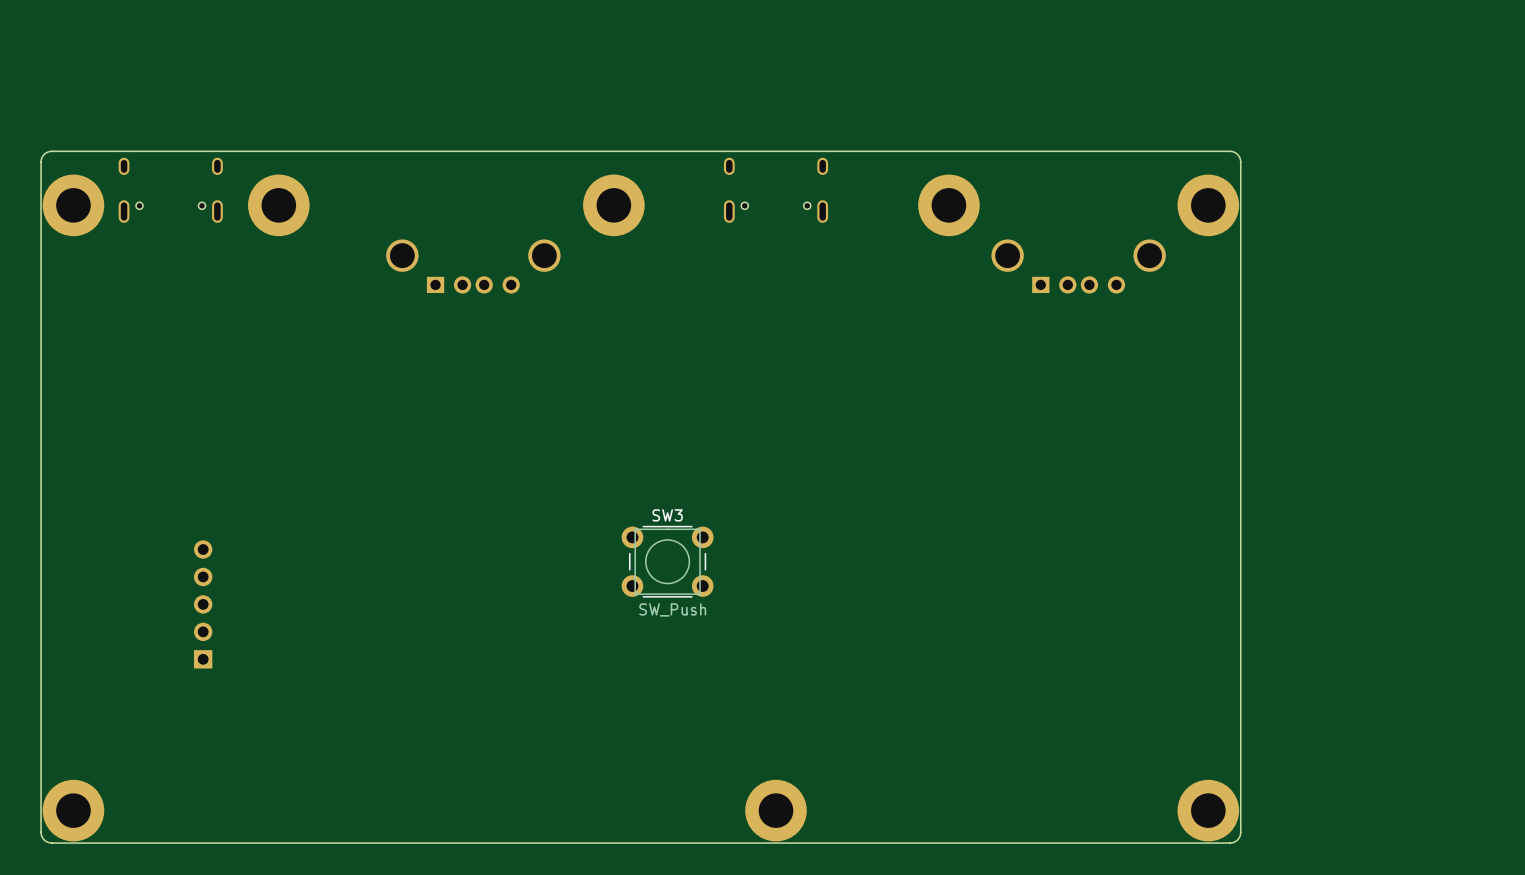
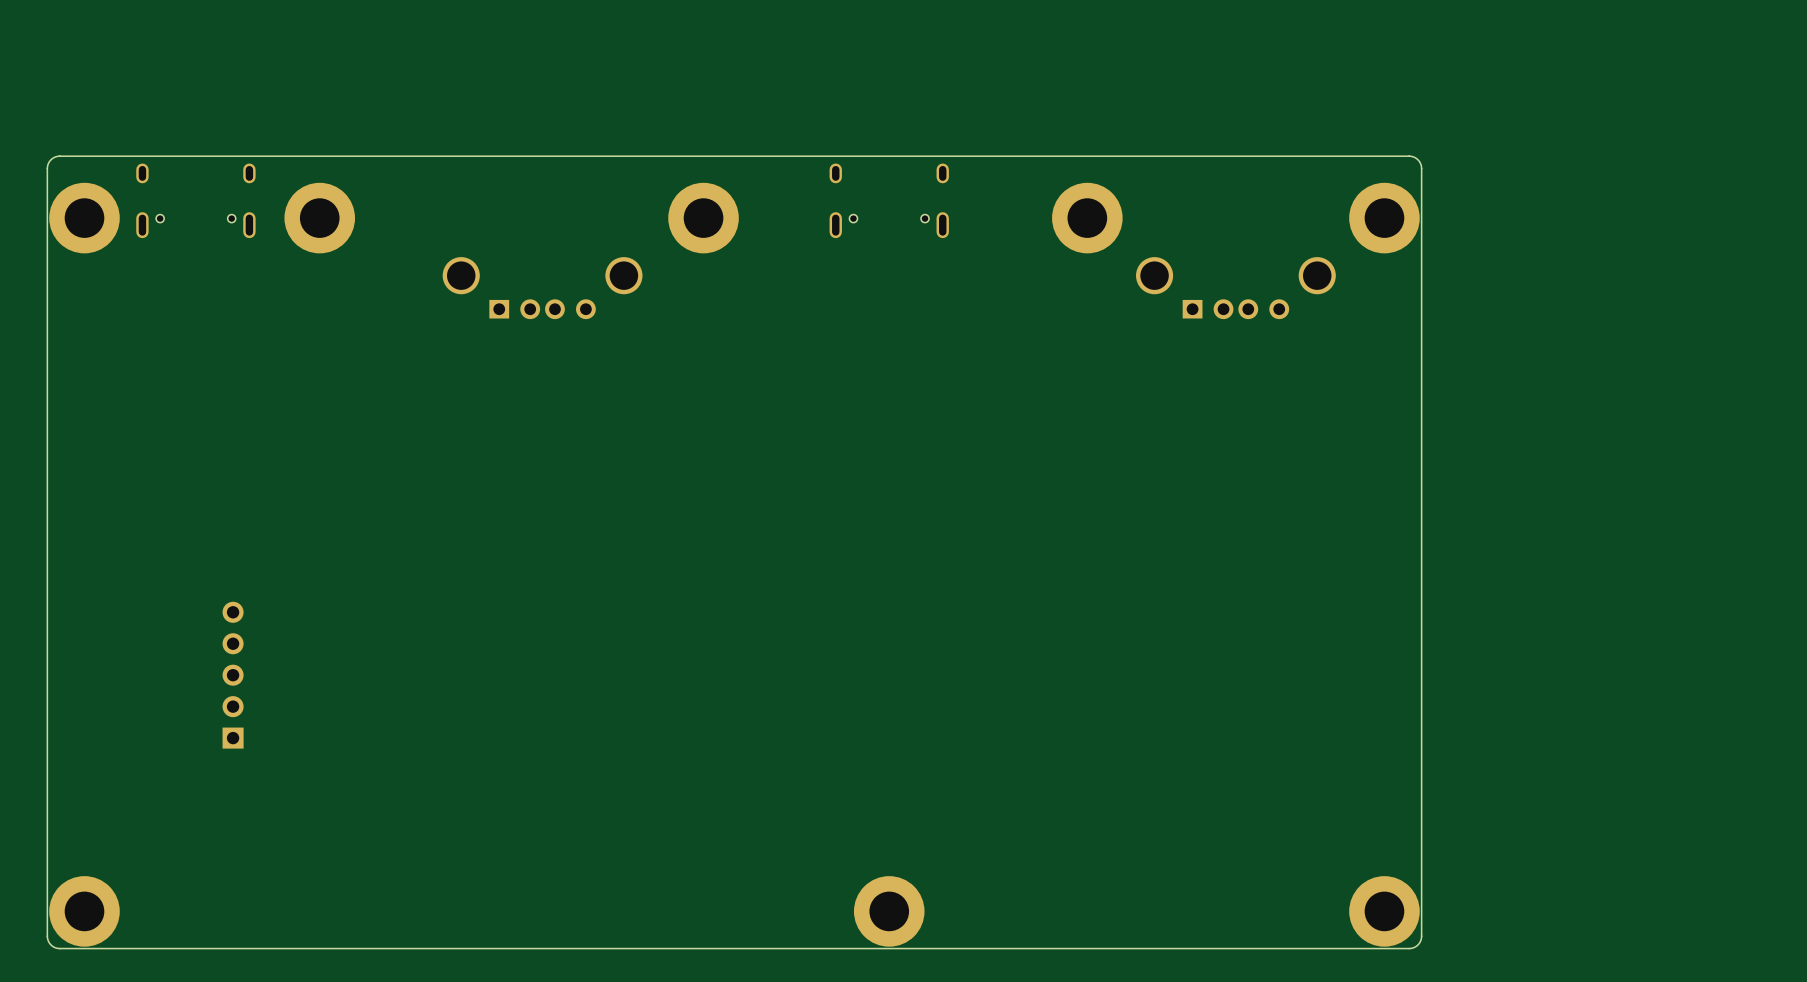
SW3: SW_Push (667, 561) -> none

